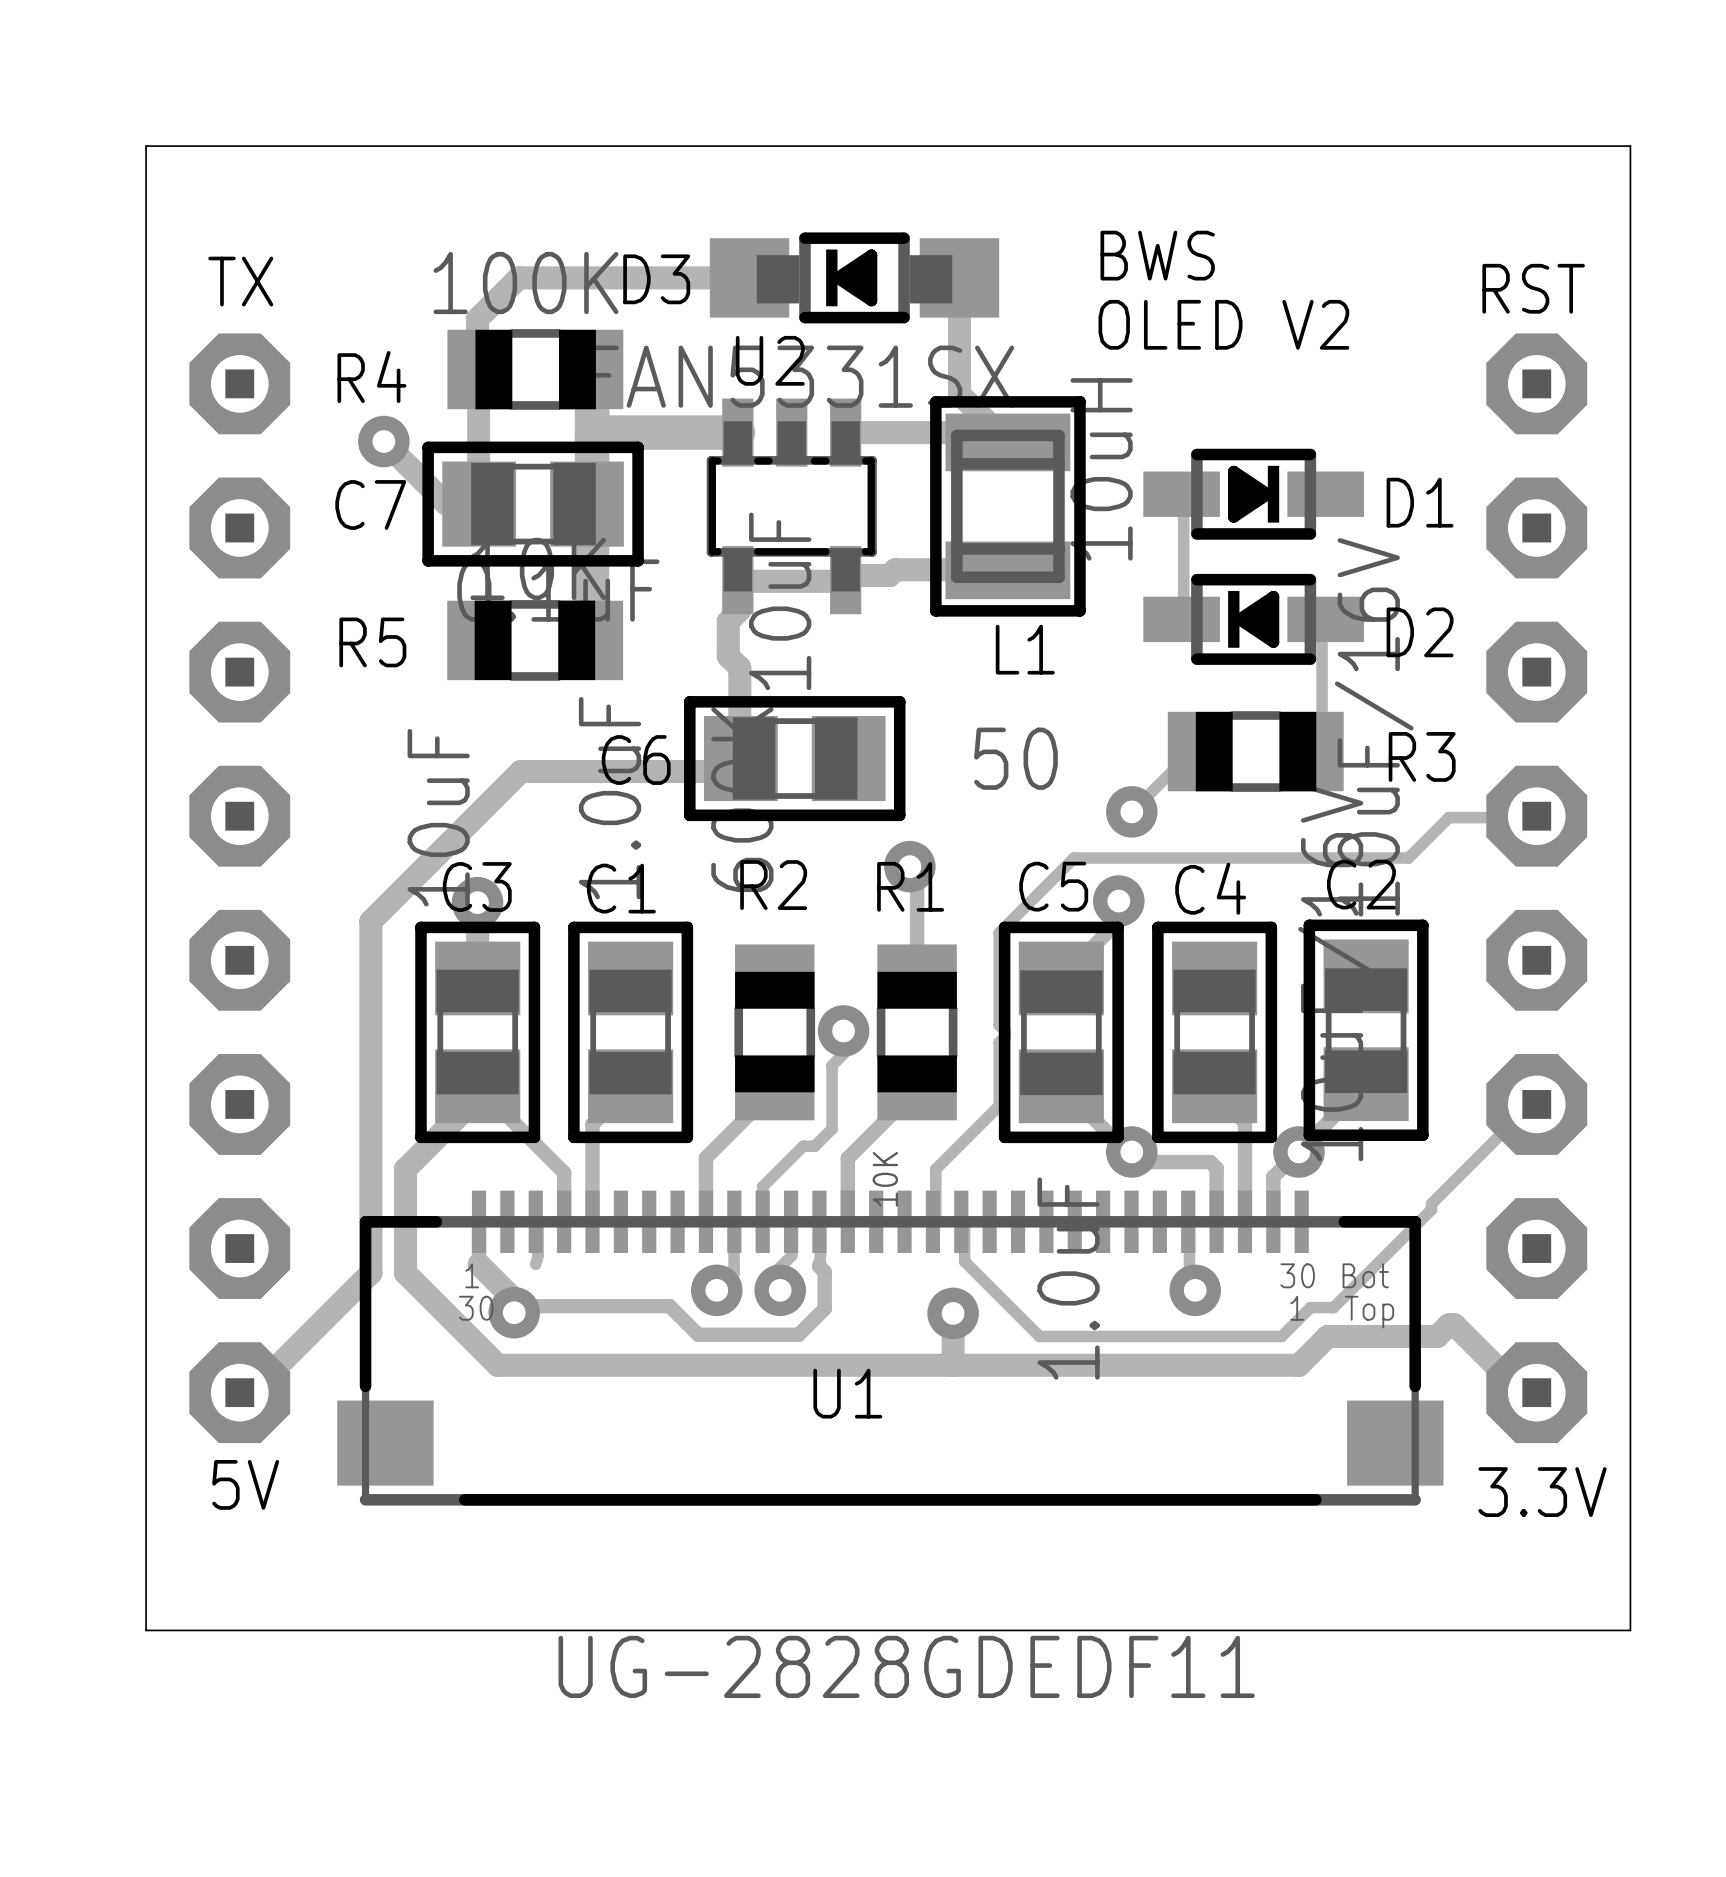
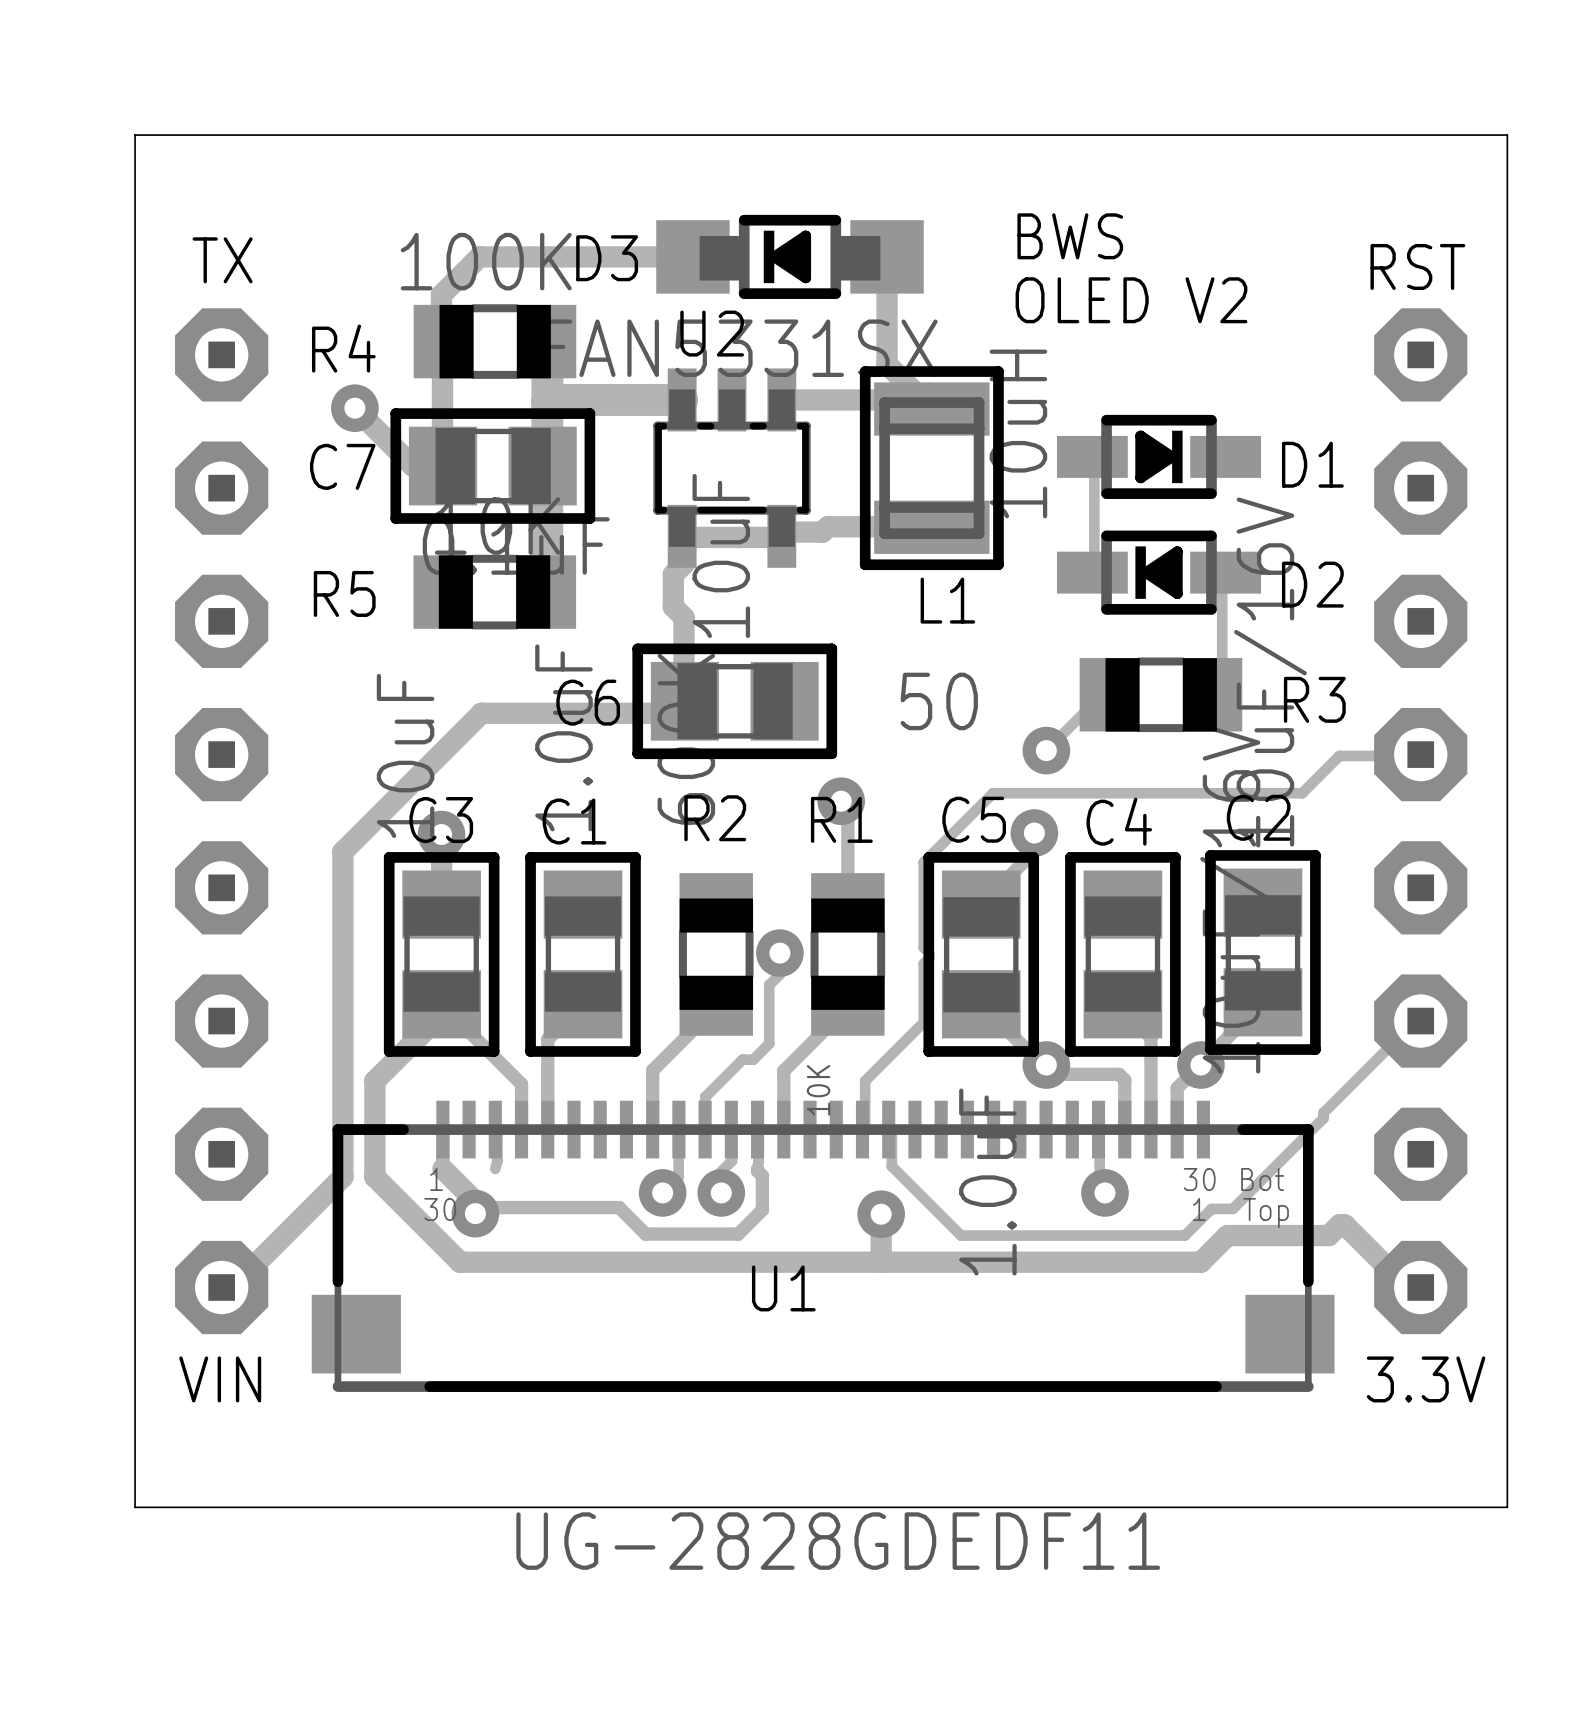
text: 5V (245, 1484) -> VIN (220, 1379)

